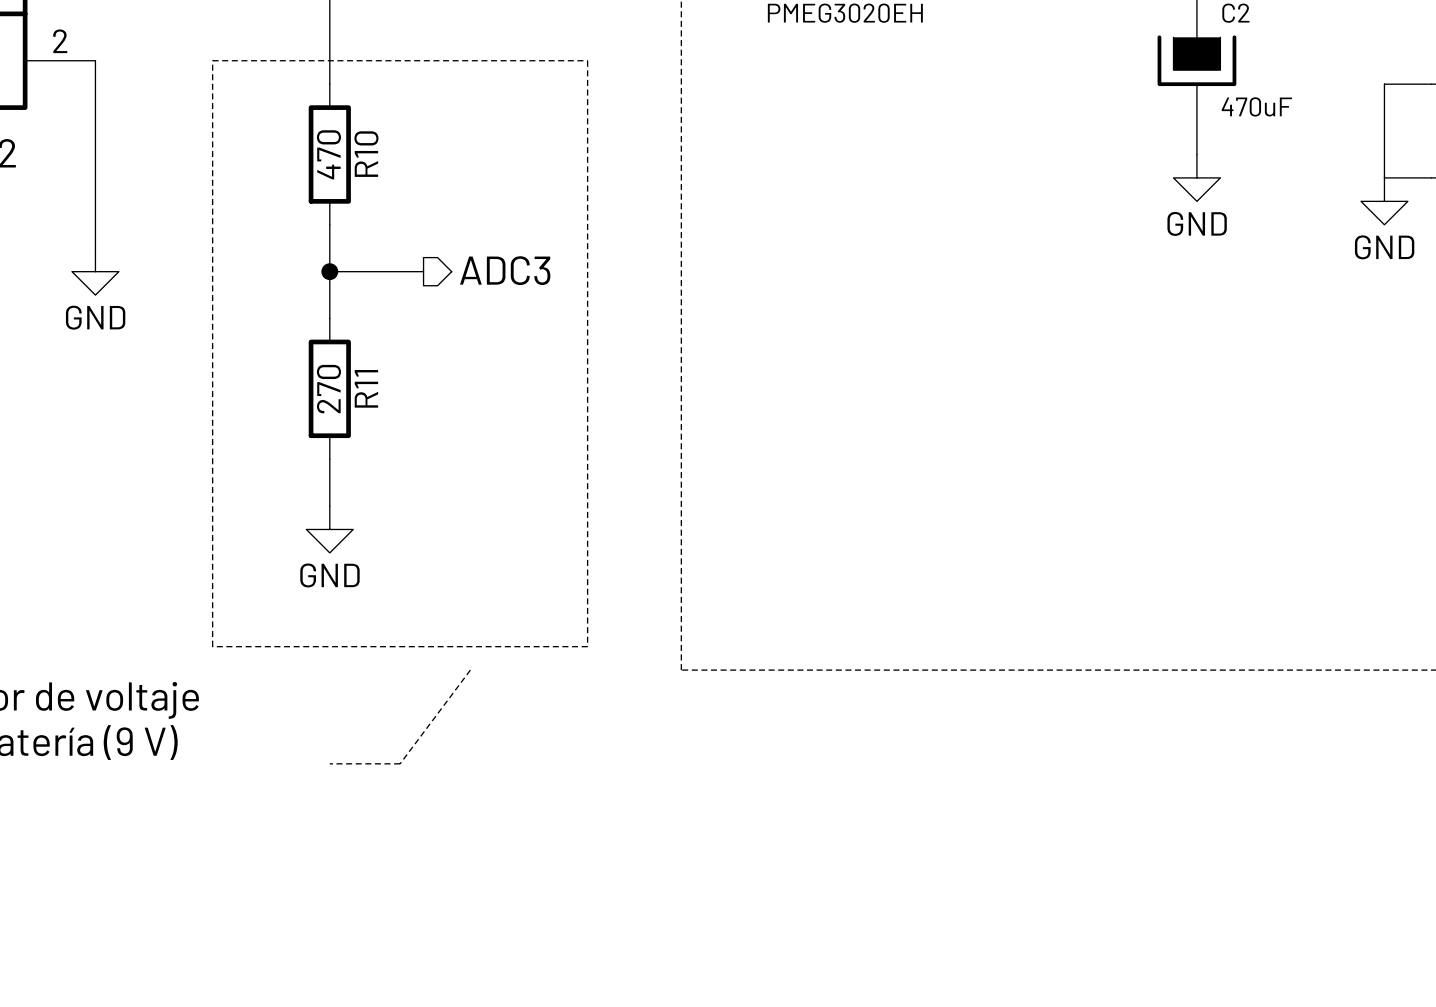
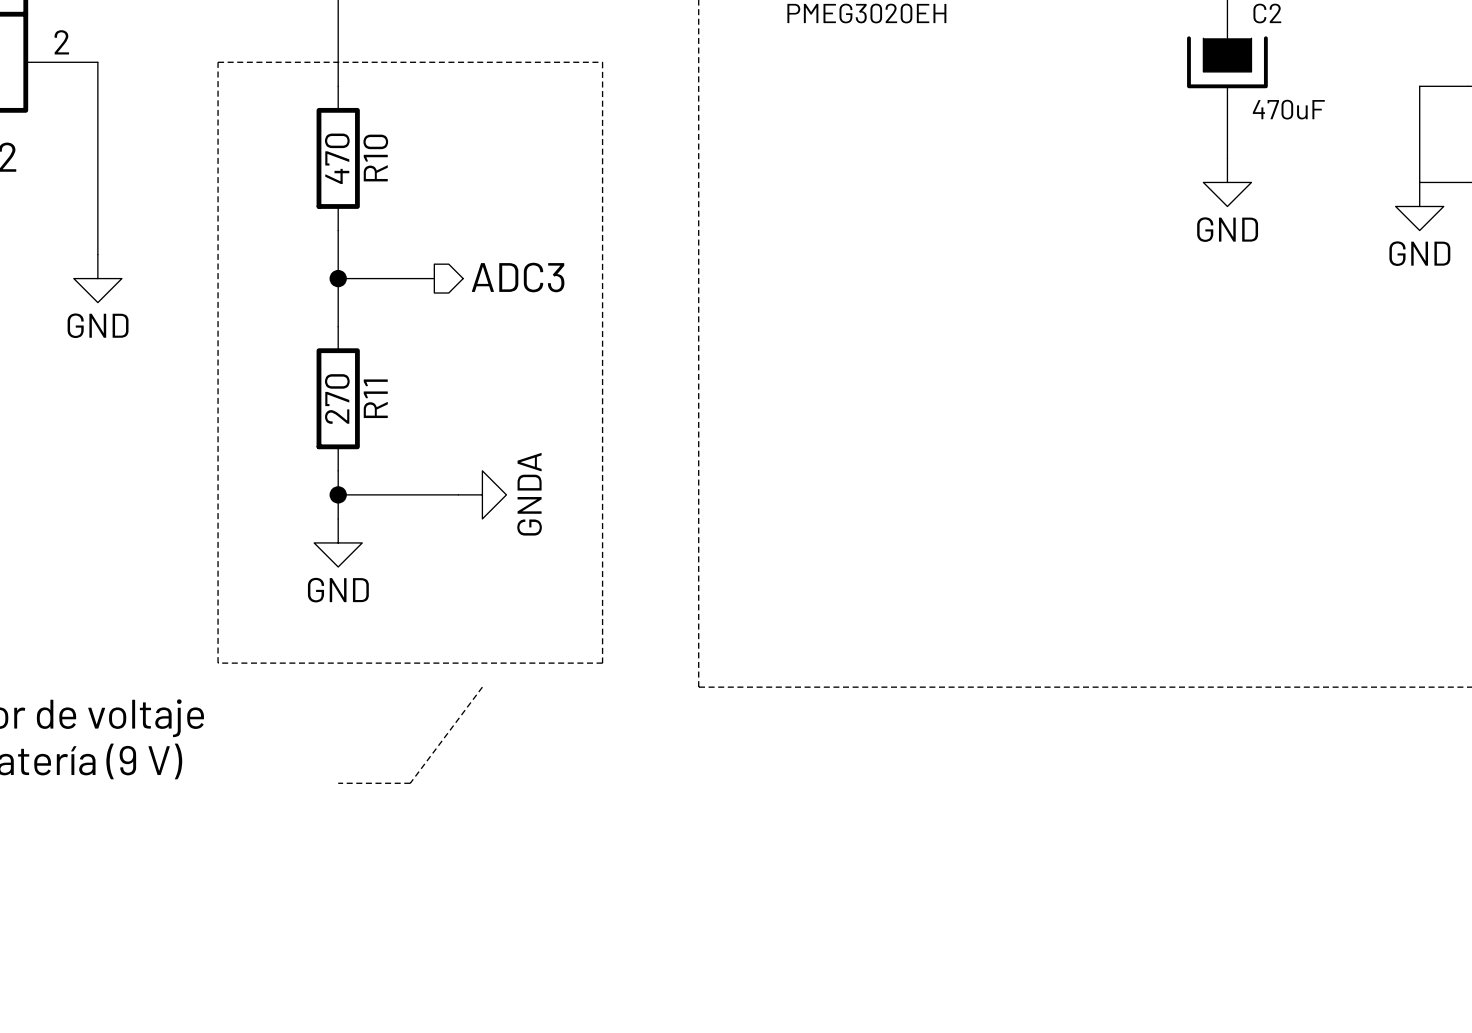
wire: none -> (338, 494) (458, 494)
junction: none -> (338, 494)
power symbol: none -> GNDA (482, 494)

